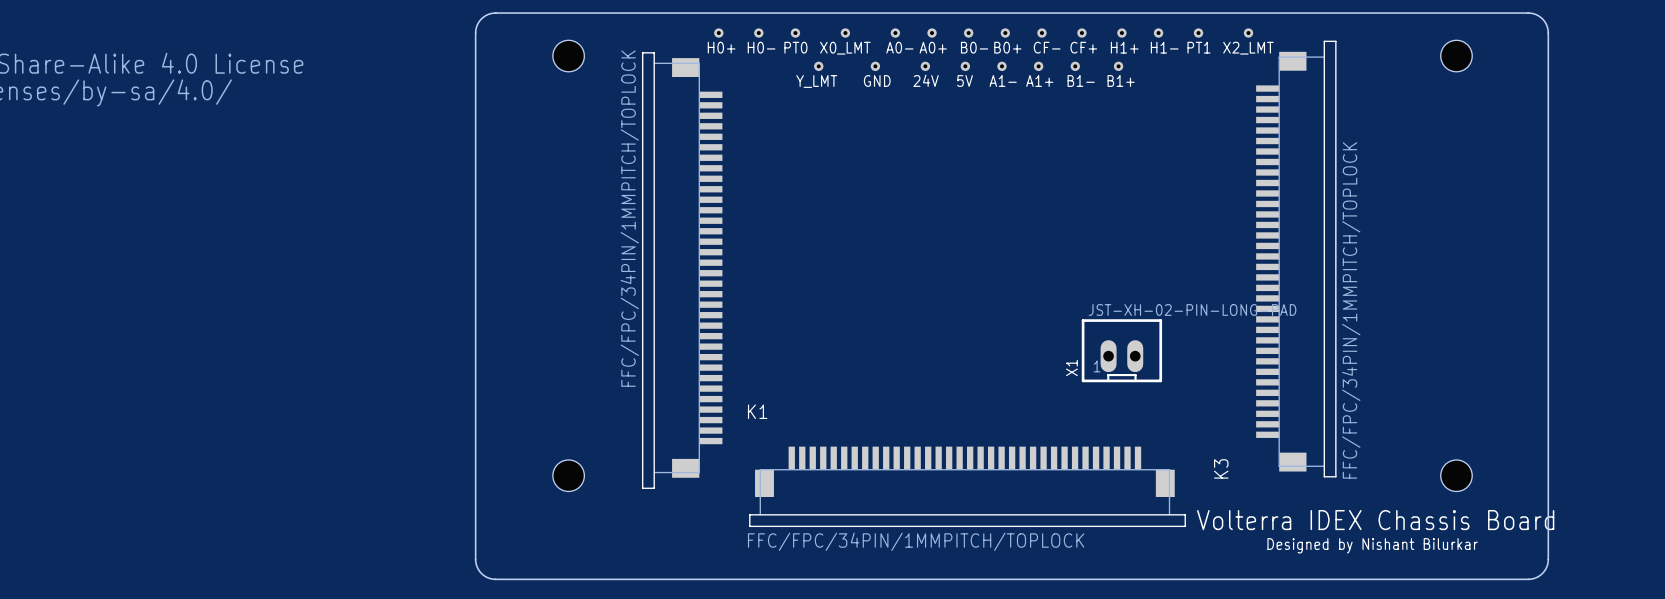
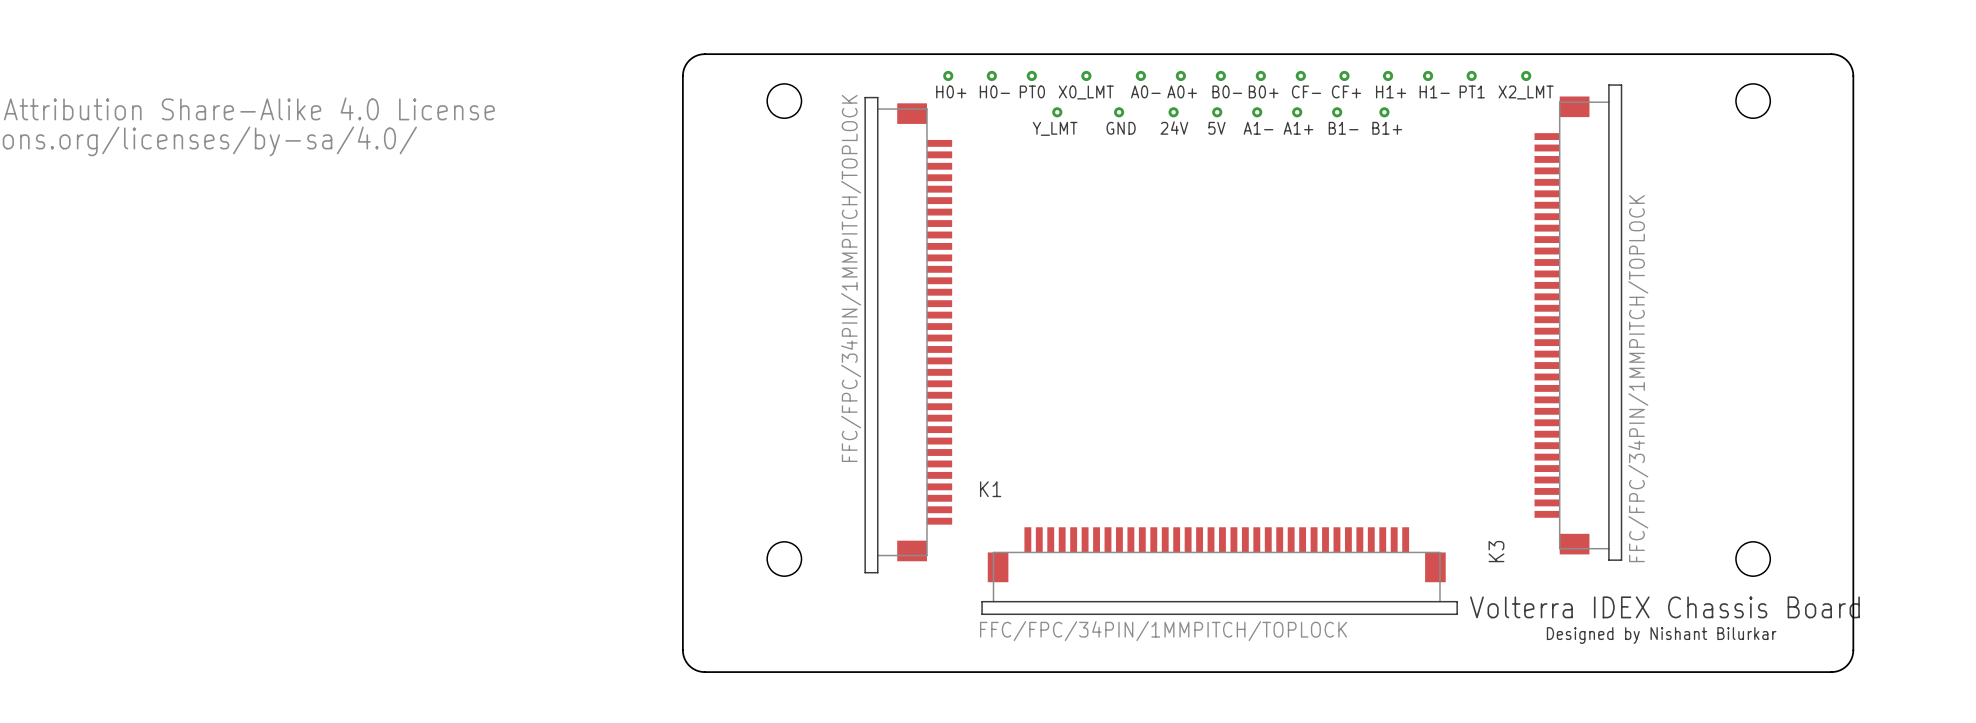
X1: JST-XH-02-PIN-LONG-PAD (1121, 350) -> none

